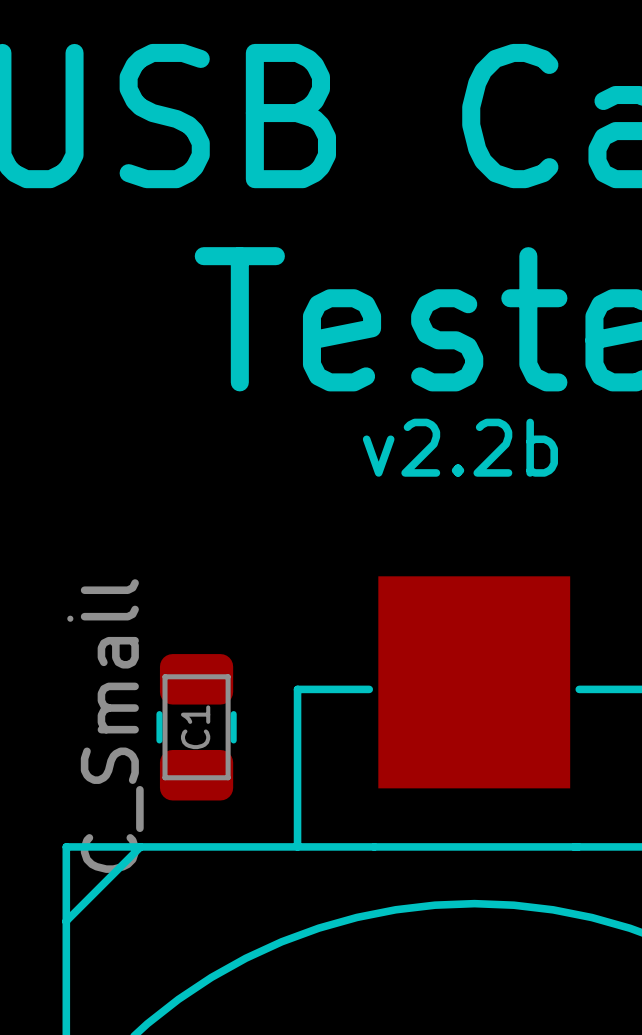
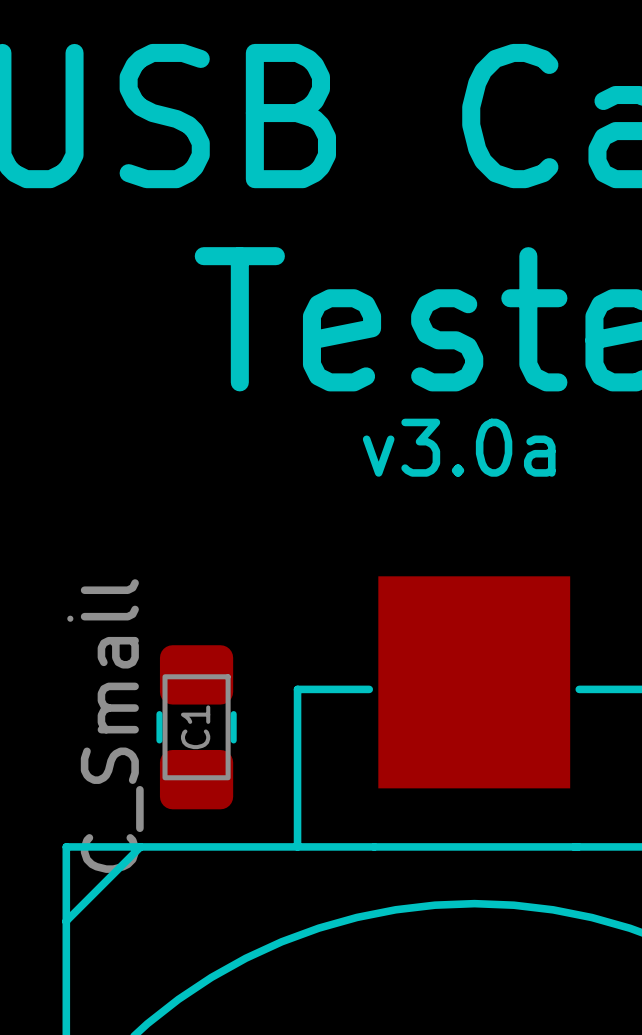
text: v2.2b (460, 447) -> v3.0a (459, 447)
C1 footprint: [156, 654, 237, 801] -> [156, 645, 237, 810]

